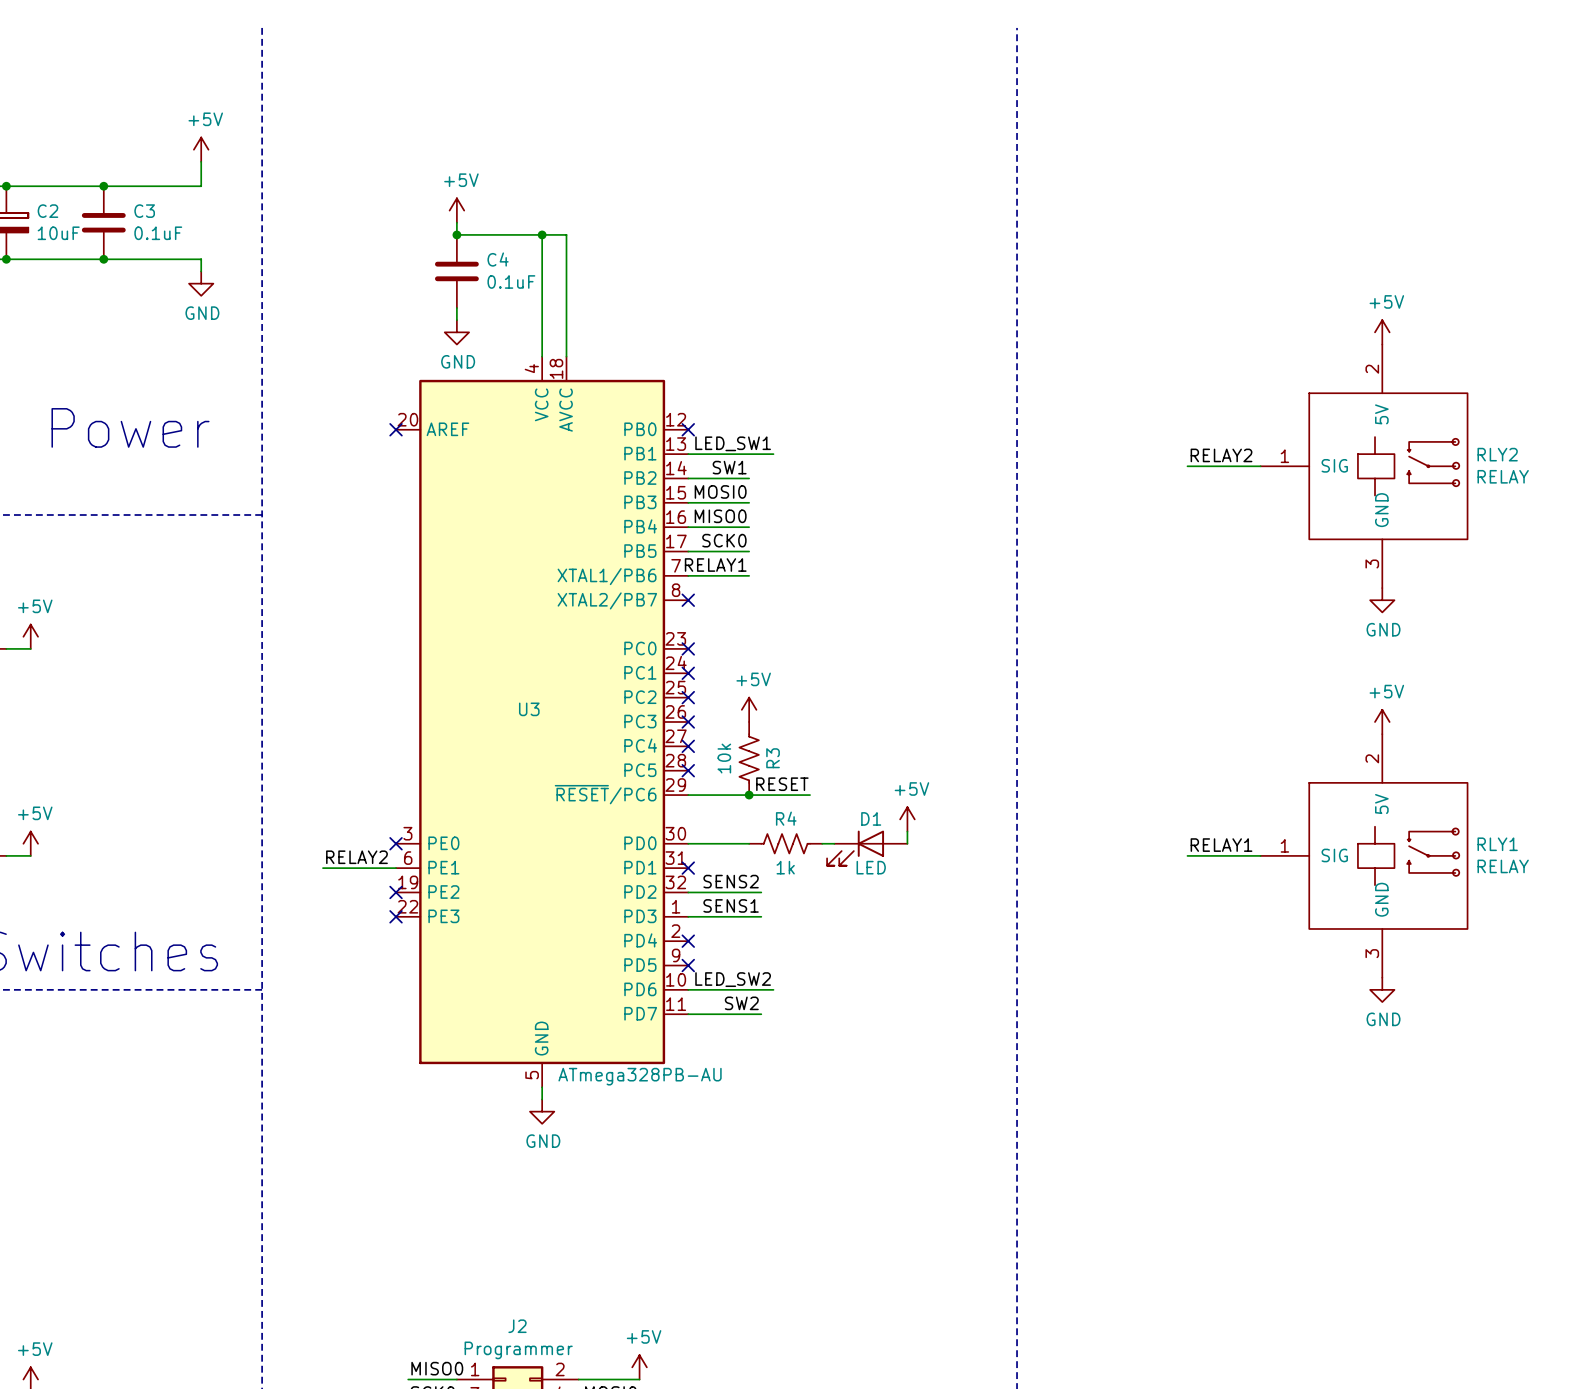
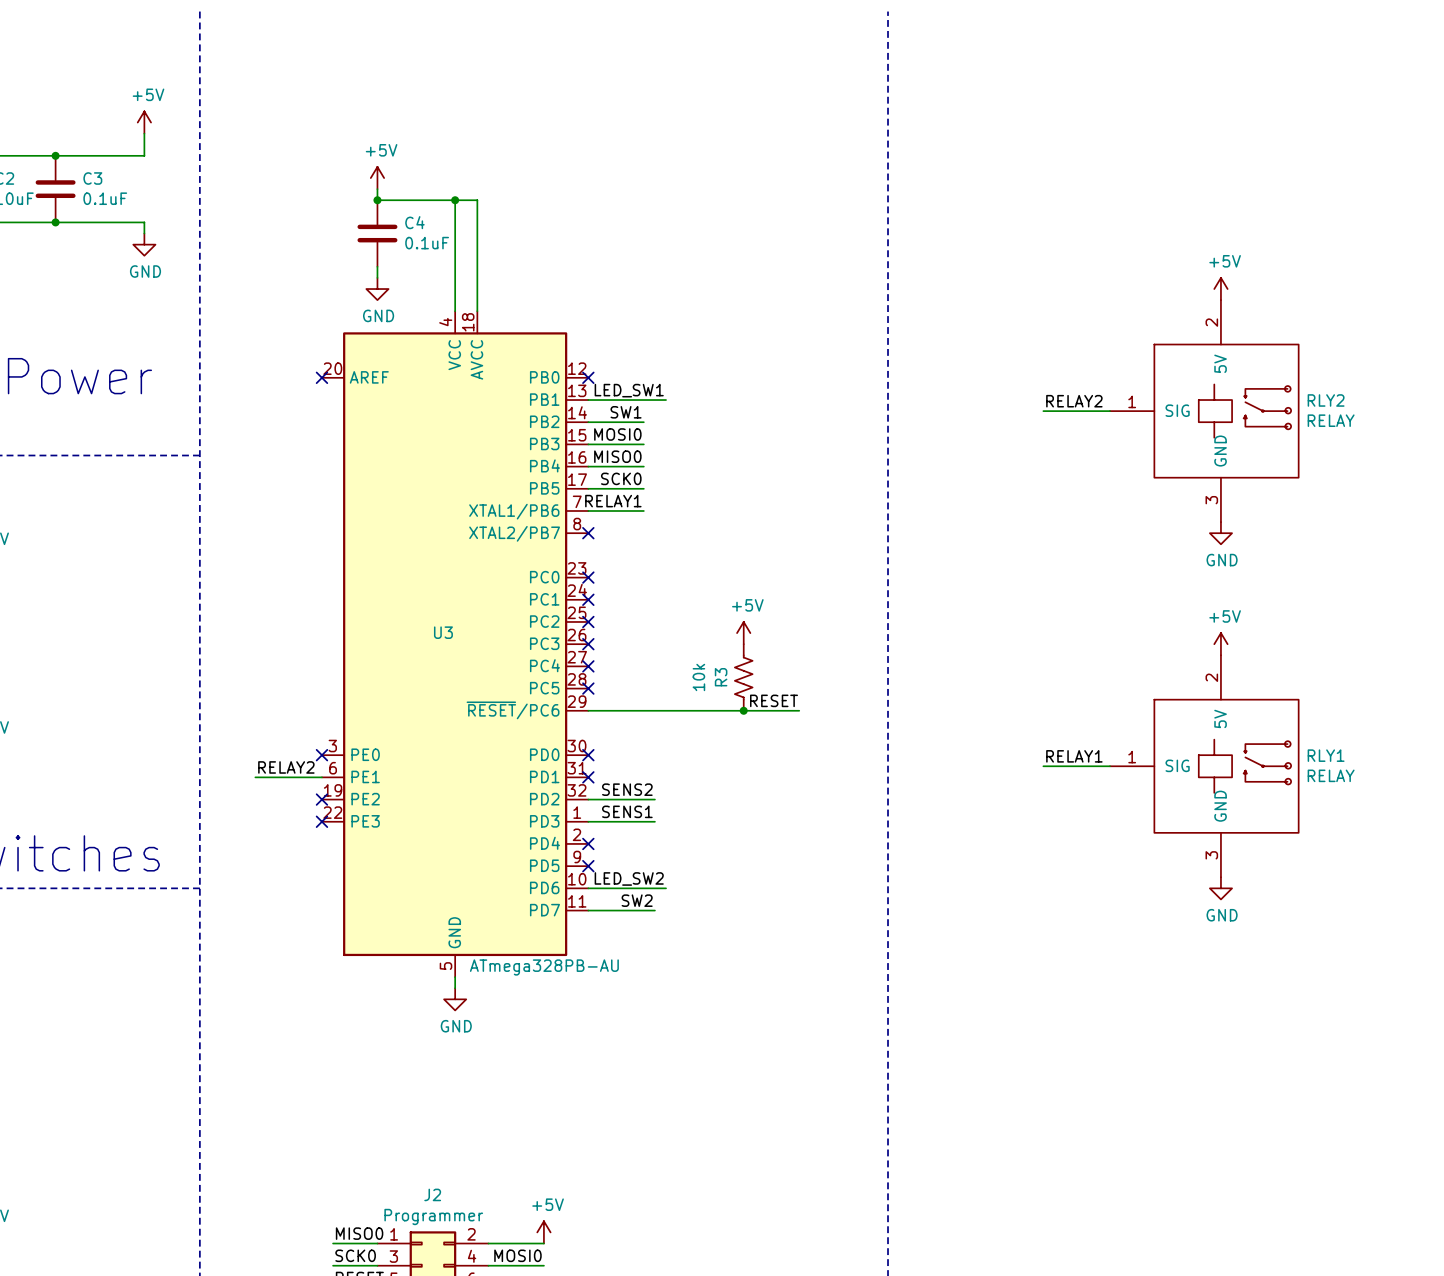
power symbol: +5V (749, 709) -> none
power symbol: none -> +5V (743, 633)
R3 value position: 10k (724, 758) -> 10k (698, 677)
R3 position: (749, 758) -> (743, 677)
R3 name position: R3 (773, 758) -> R3 (721, 677)
label position: RESET (782, 784) -> RESET (774, 700)
junction: (749, 795) -> none
wire: none -> (699, 710) (799, 710)
junction: none -> (743, 710)
power symbol: +5V (907, 819) -> none
wire: (907, 831) (907, 843) -> none
wire: (688, 843) (749, 843) -> none
no-connect mark: none -> (588, 755)
R4: 1k (785, 843) -> none
wire: (822, 843) (834, 843) -> none
D1: LED (867, 848) -> none

